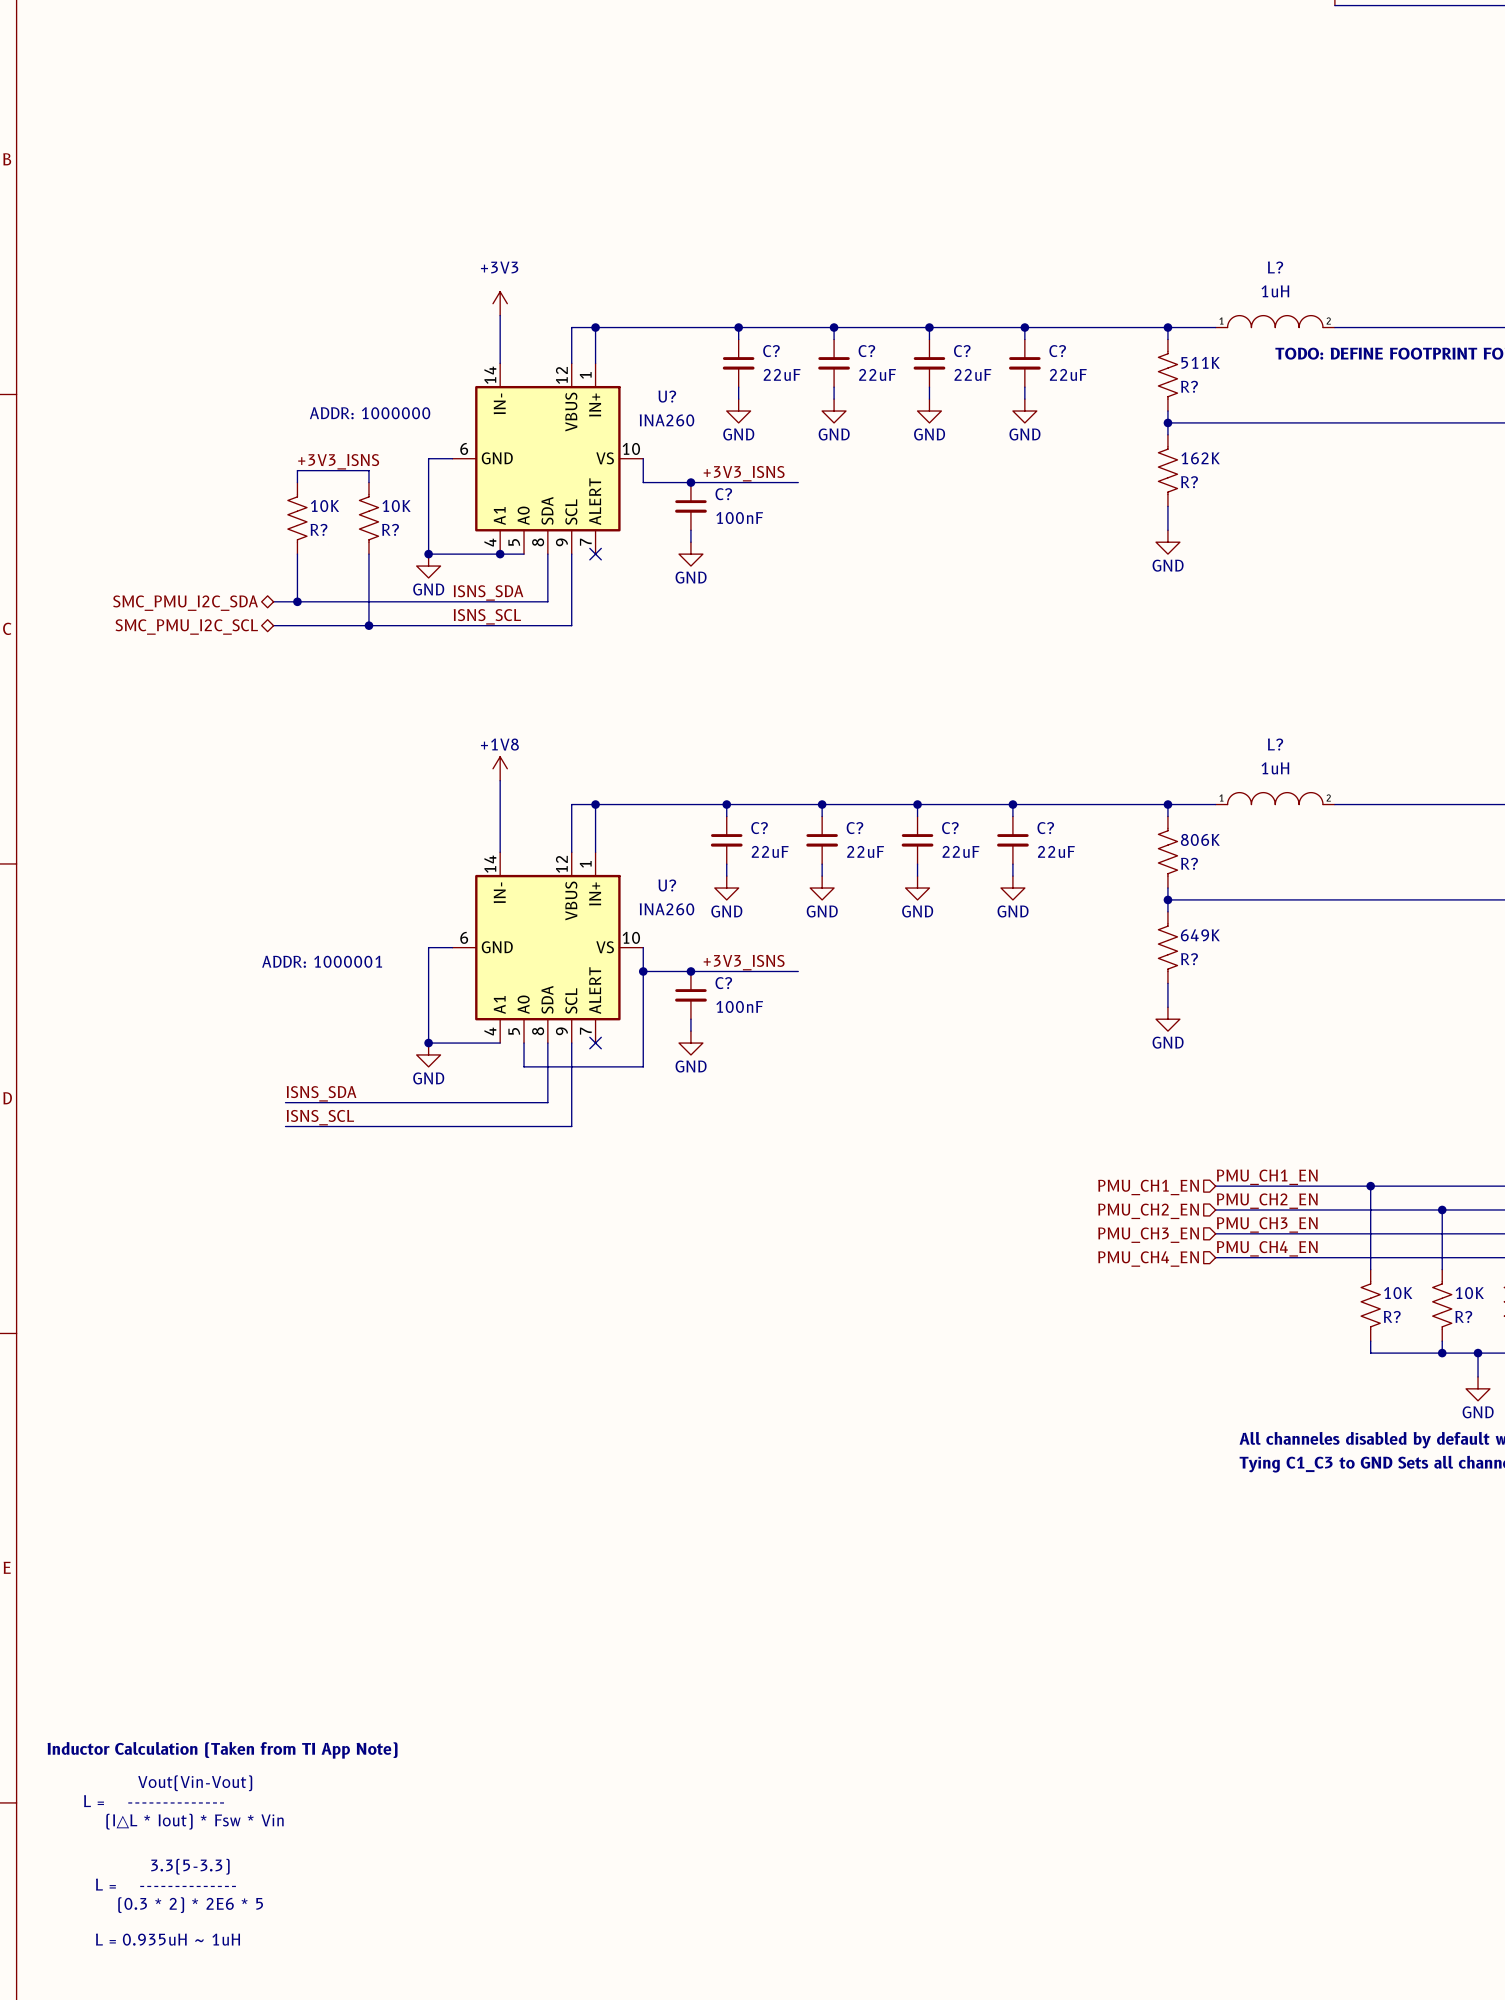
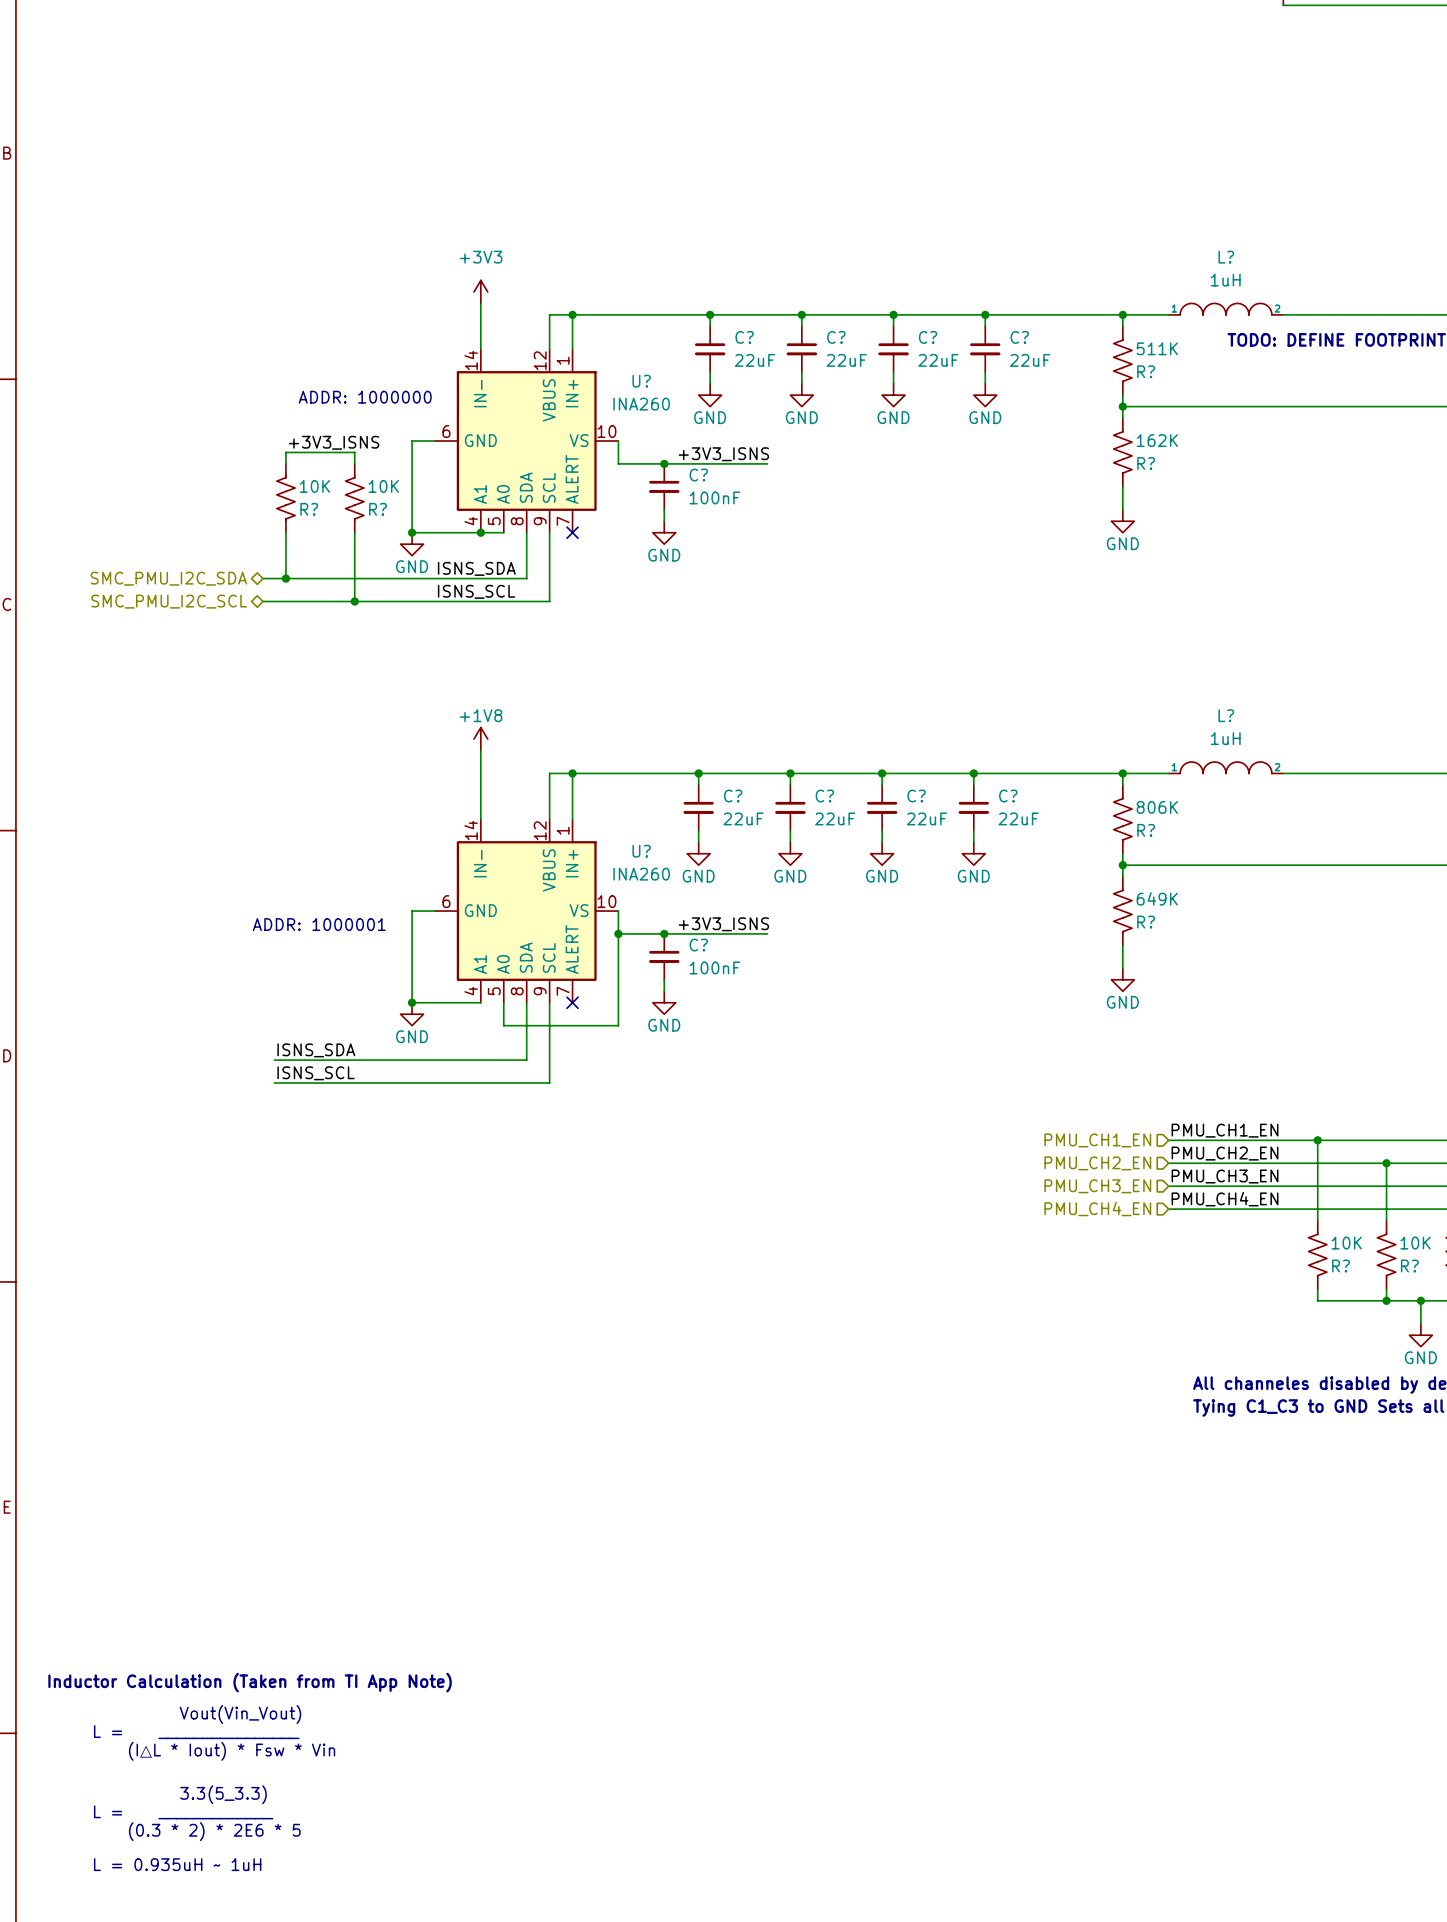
text: Vout(Vin-Vout) (195, 1783) -> Vout(Vin_Vout) (240, 1714)
text: L = -------------- (154, 1801) -> none
text: none -> L = ________________ (196, 1732)
text position: (I△L * Iout) * Fsw * Vin (194, 1821) -> (I△L * Iout) * Fsw * Vin (232, 1751)
text: 3.3(5-3.3) (190, 1866) -> 3.3(5_3.3) (223, 1794)
text: L = -------------- (165, 1884) -> L = _____________ (183, 1812)

